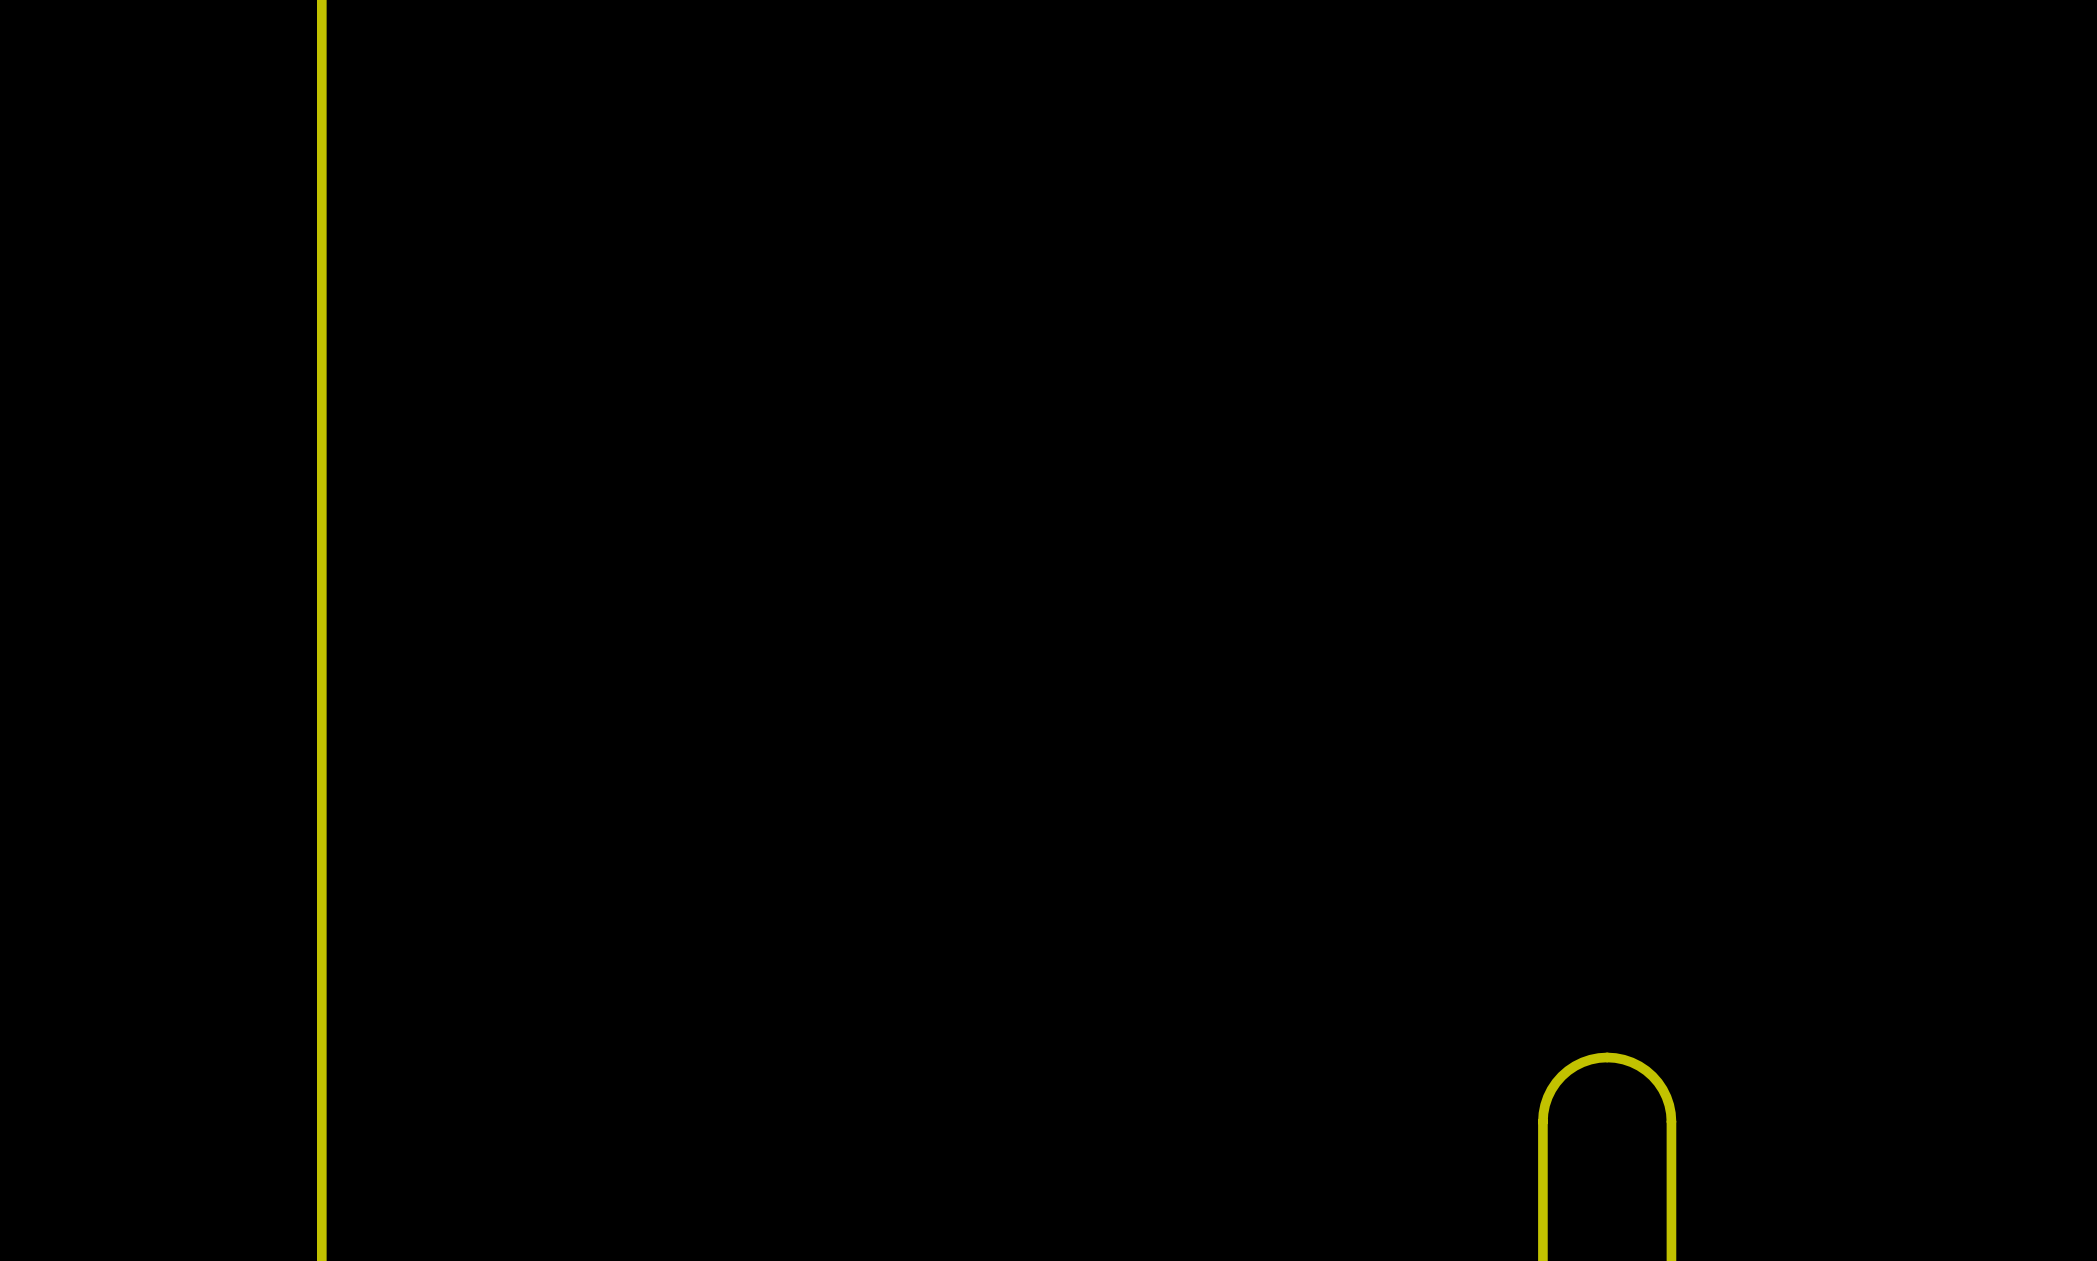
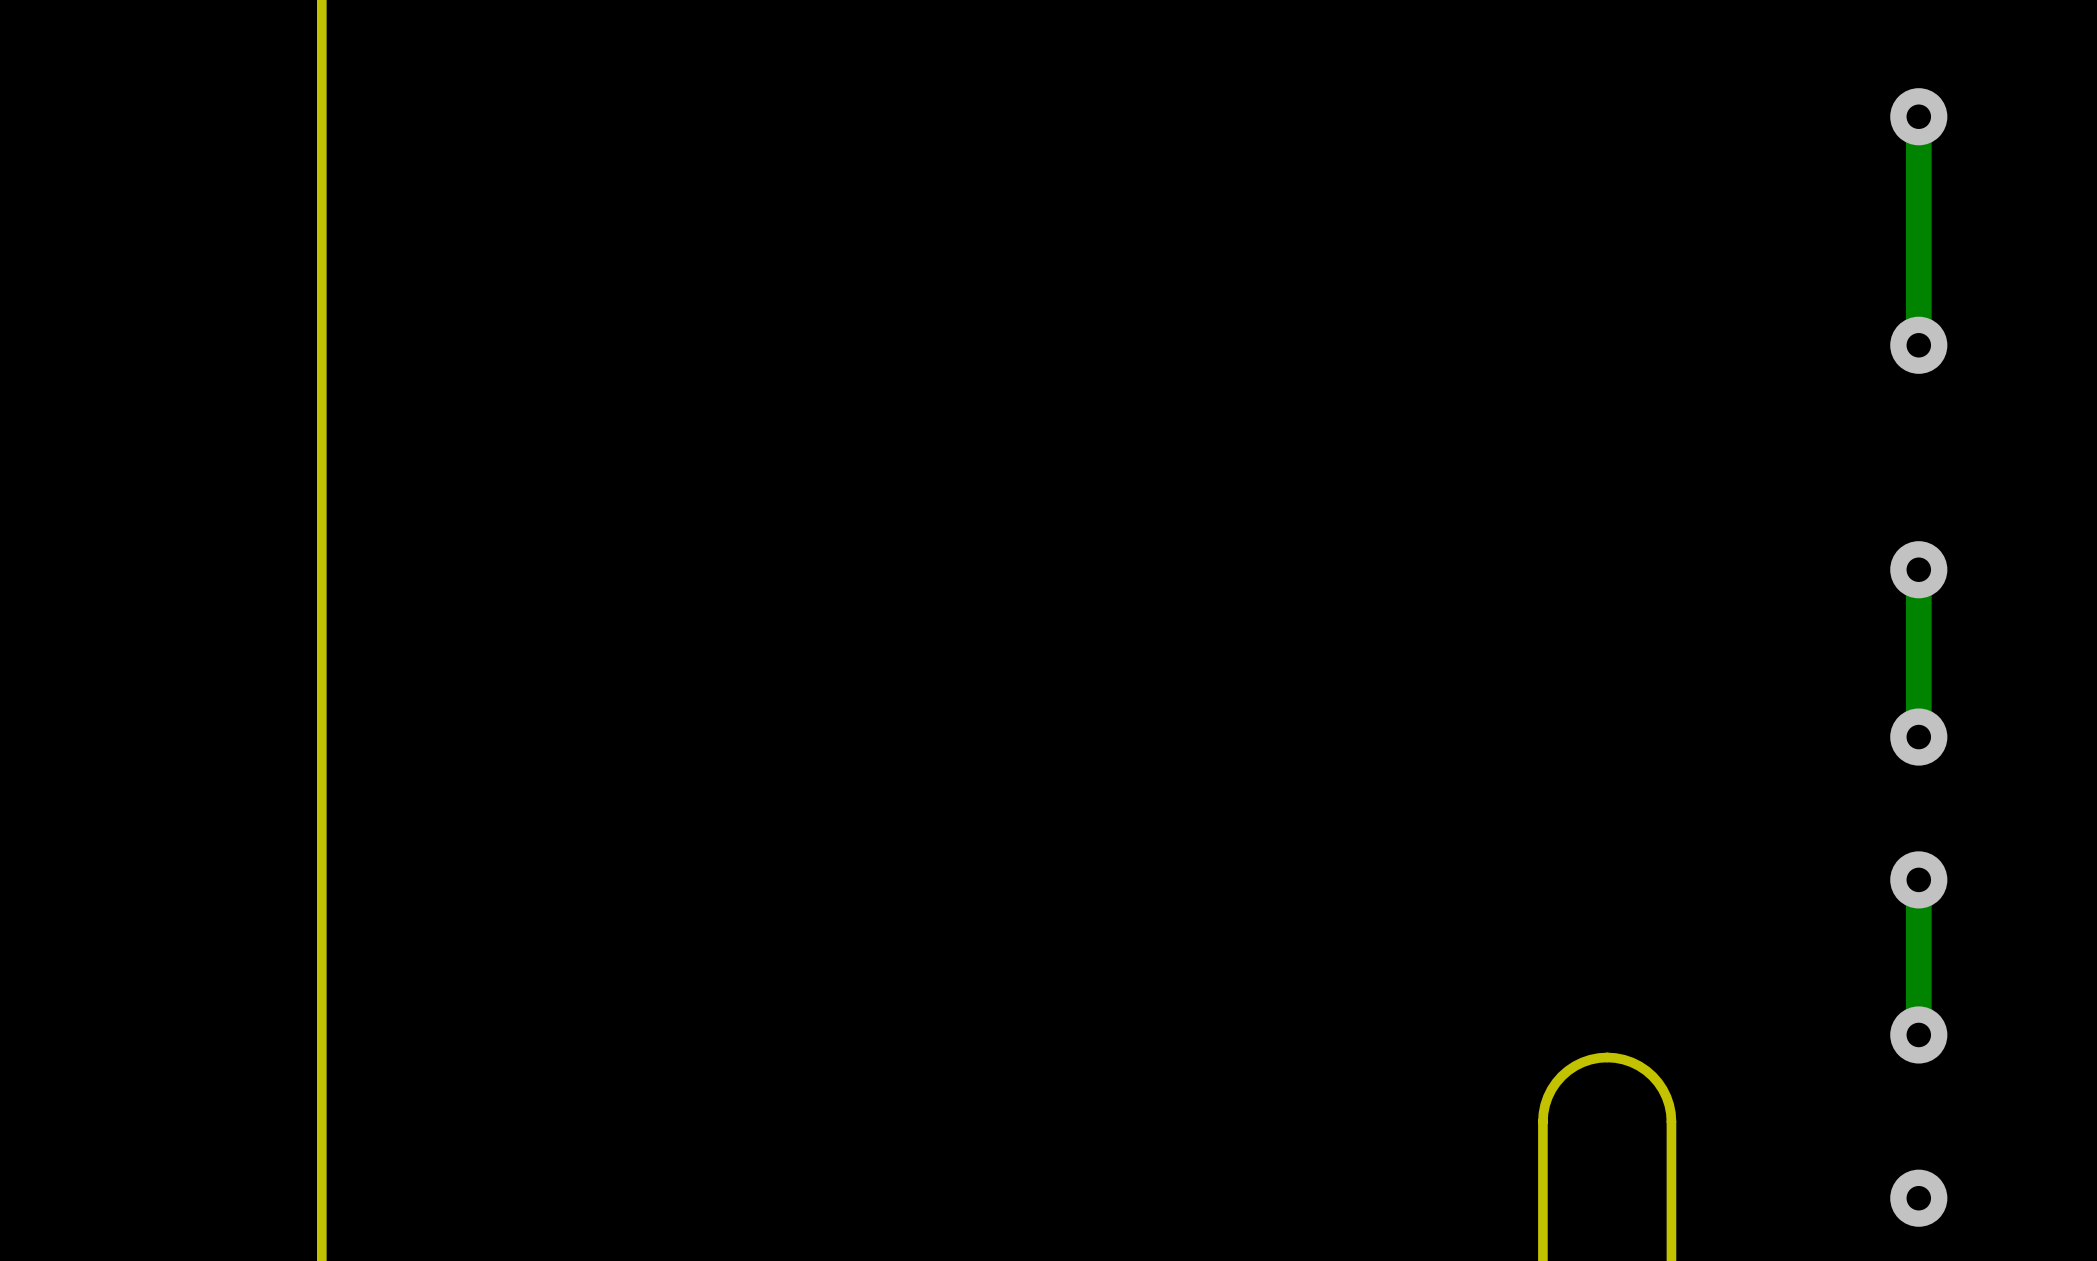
track: none -> (1918, 116) (1918, 345)
via: none -> (1918, 116)
via: none -> (1918, 345)
track: none -> (1918, 569) (1918, 737)
via: none -> (1918, 569)
via: none -> (1918, 737)
track: none -> (1918, 879) (1918, 1034)
via: none -> (1918, 879)
via: none -> (1918, 1034)
via: none -> (1918, 1198)

